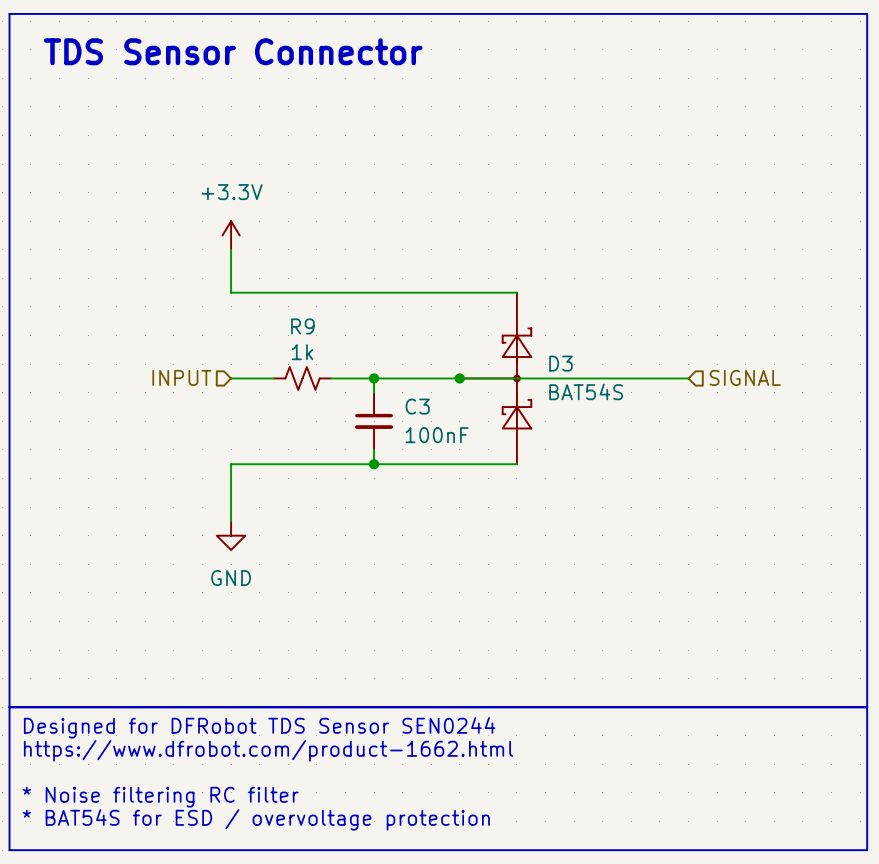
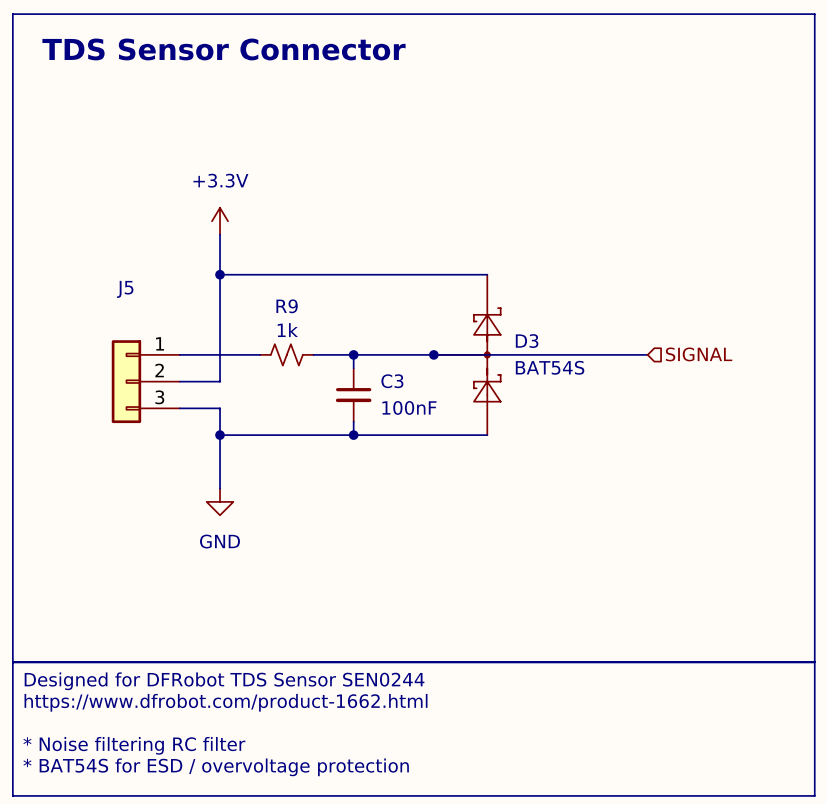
wire: none -> (220, 274) (220, 381) (179, 381)
junction: none -> (220, 274)
hierarchical label: INPUT (181, 377) -> none
wire: none -> (179, 354) (220, 354)
J5: none -> (145, 381)
wire: none -> (179, 408) (220, 408) (220, 435)
junction: none -> (220, 435)

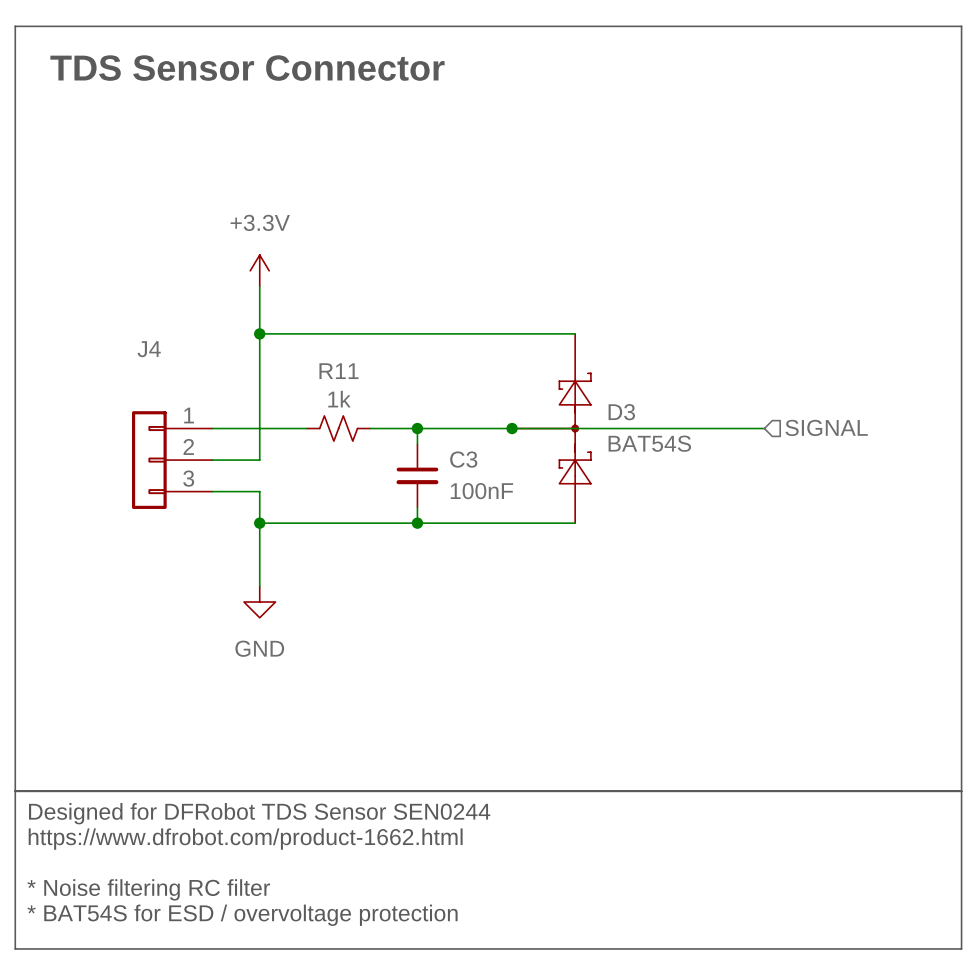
J5 name: J5 (125, 289) -> J4 (149, 349)
R9 name: R9 (287, 306) -> R11 (338, 371)

